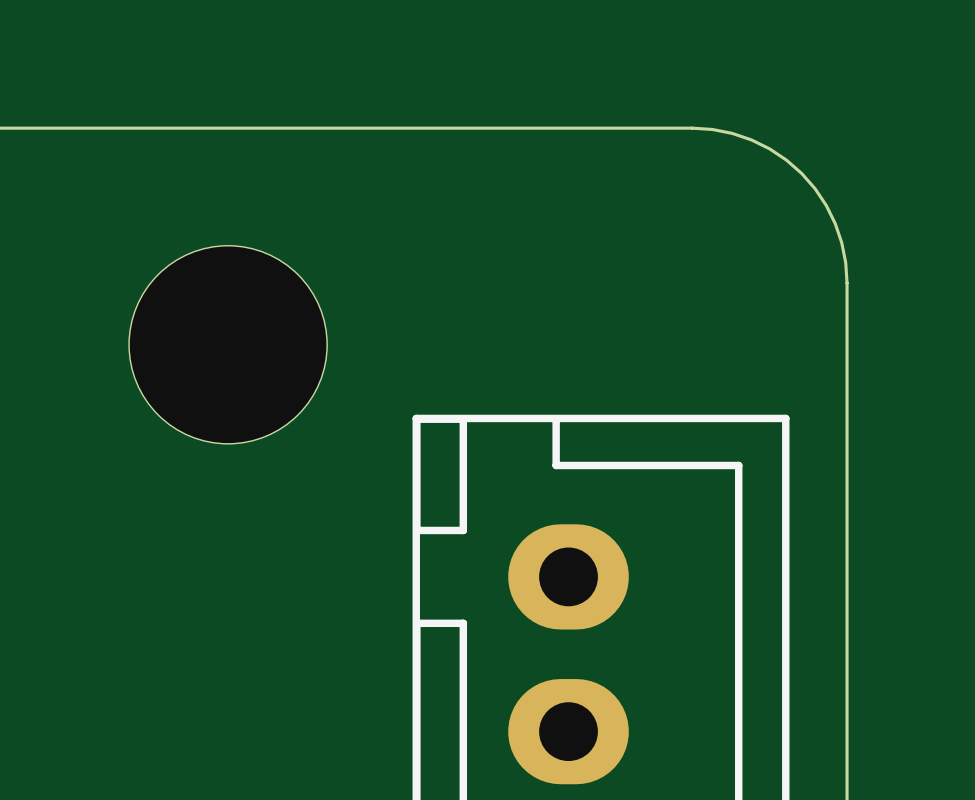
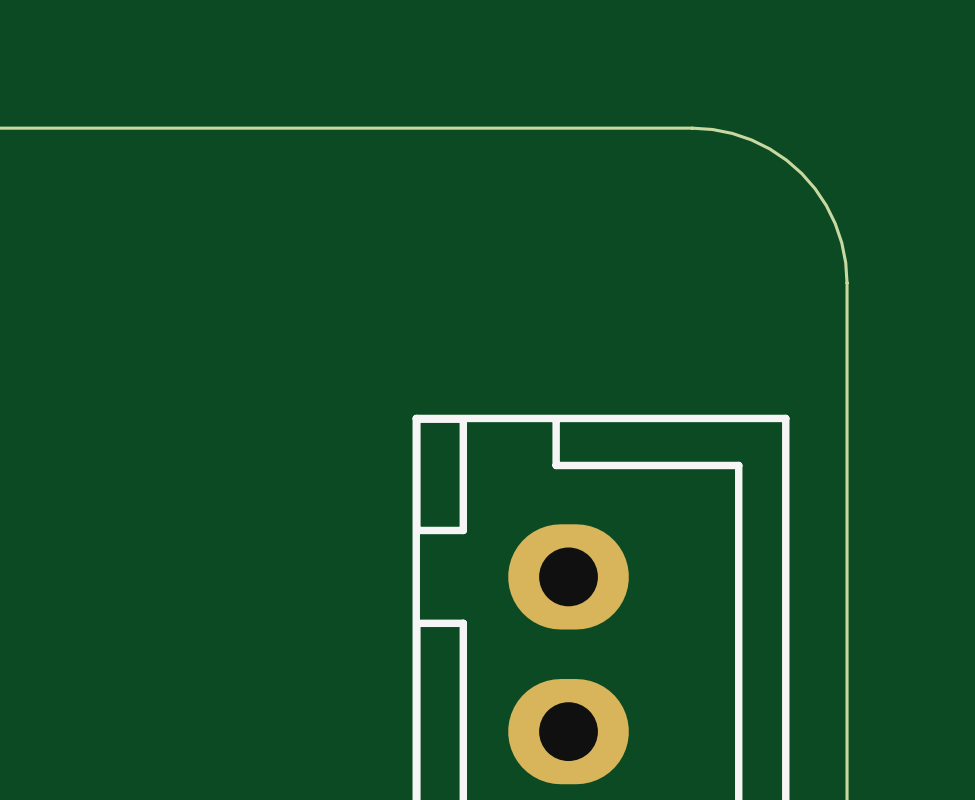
part: (228, 344) -> none

